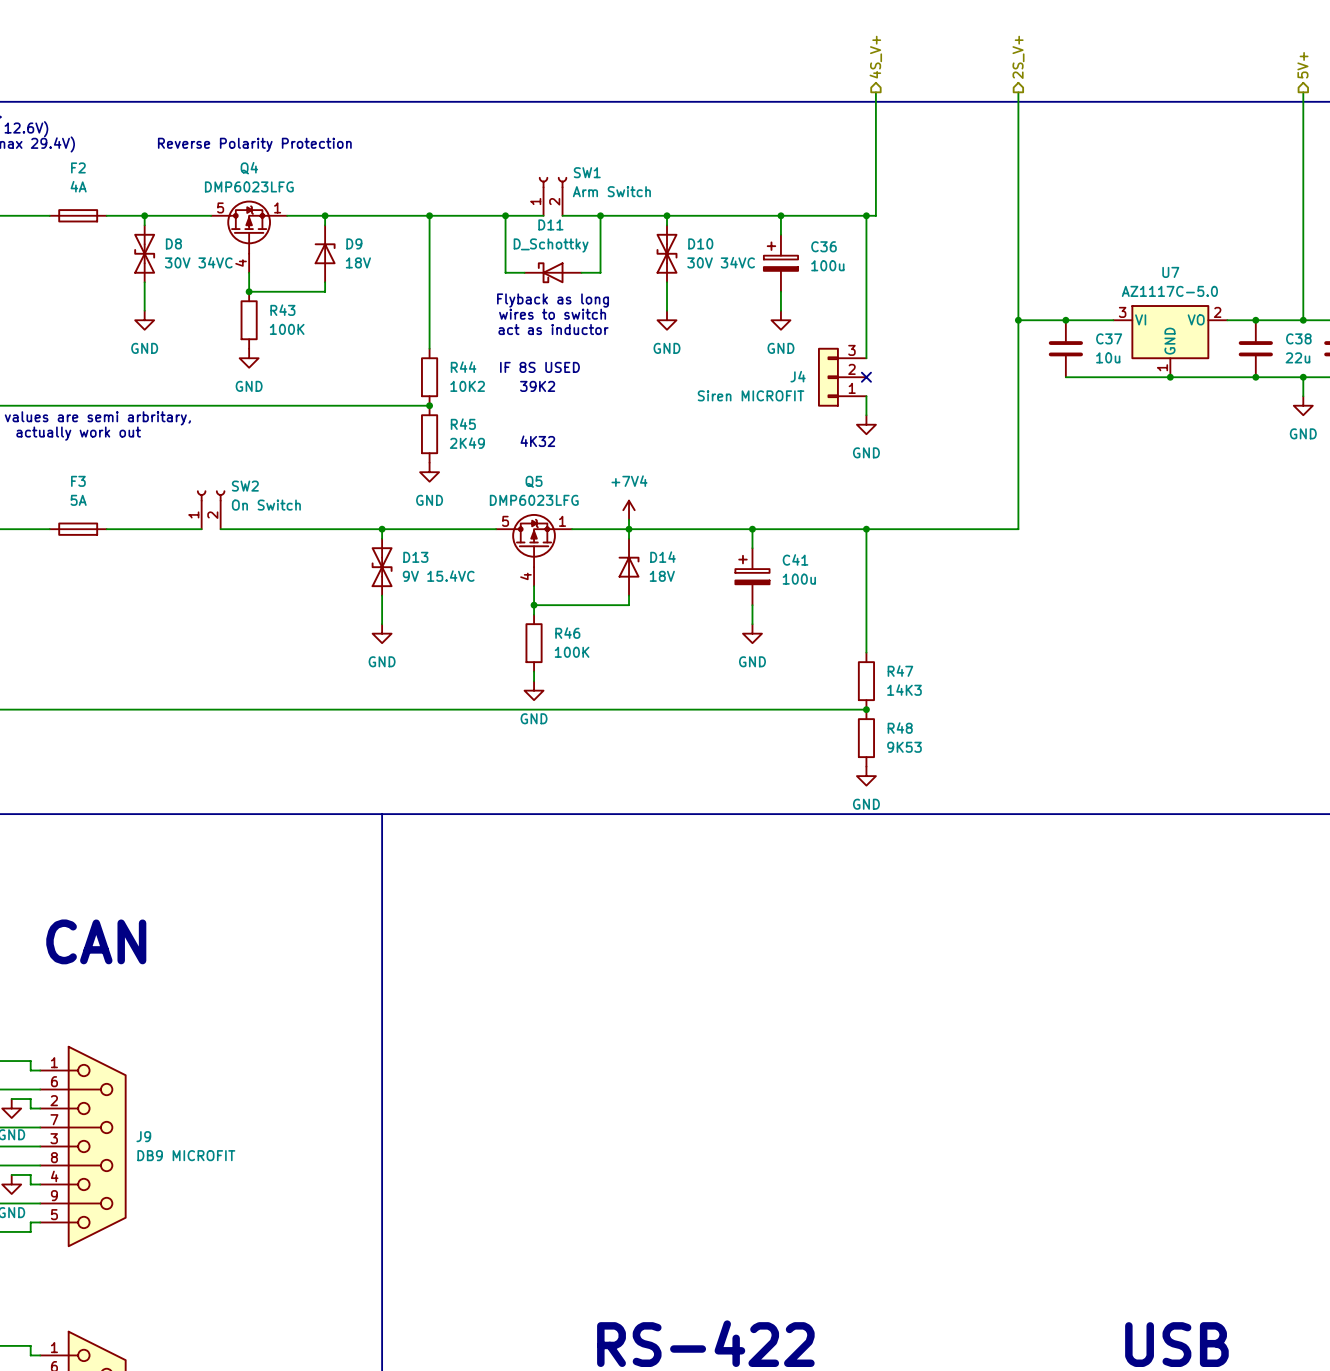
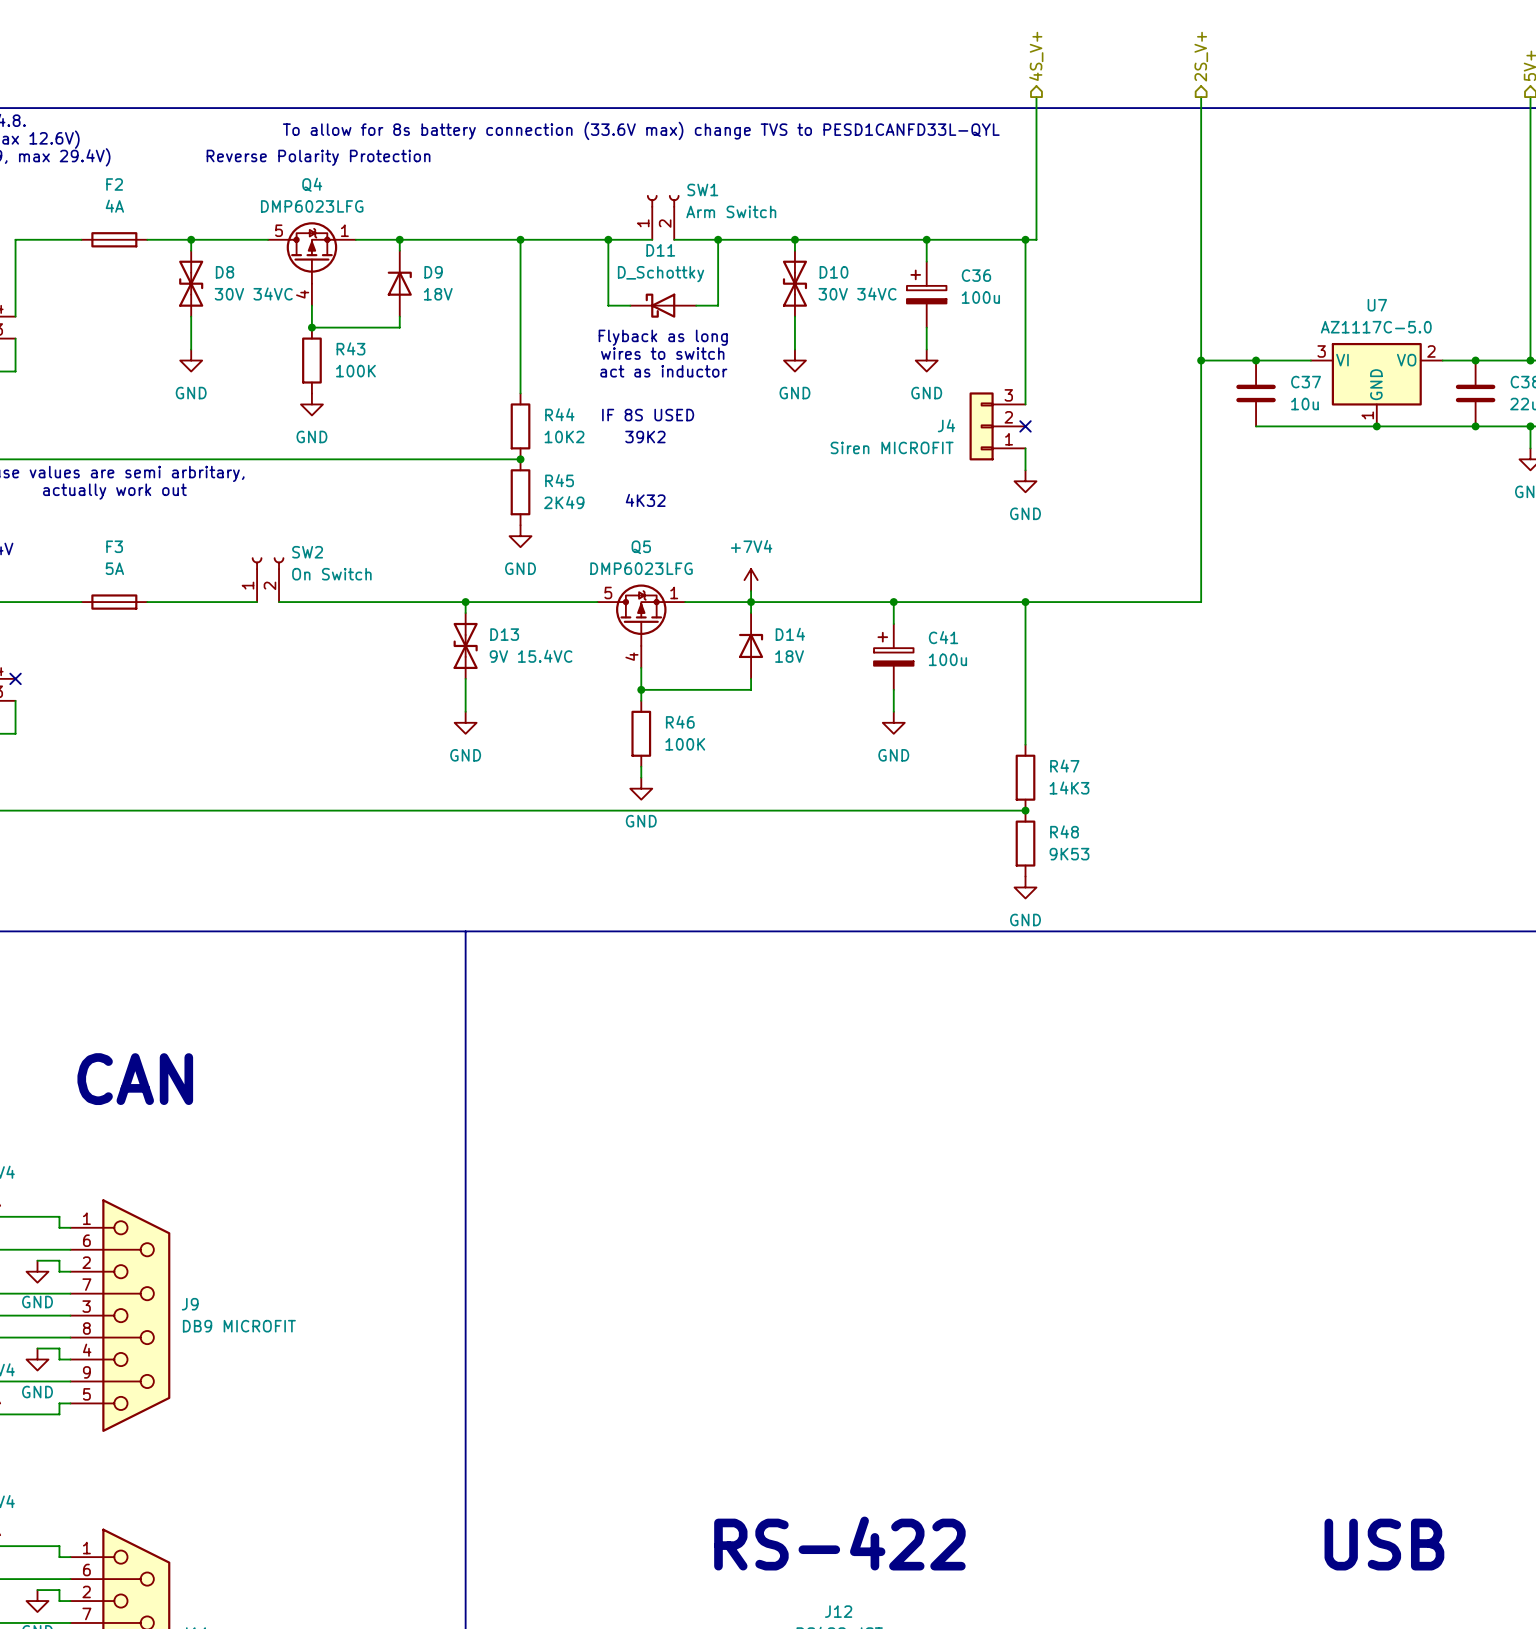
text: none -> To allow for 8s battery connection (33.6V max) change TVS to PESD1CANFD33L-QYL (641, 130)

